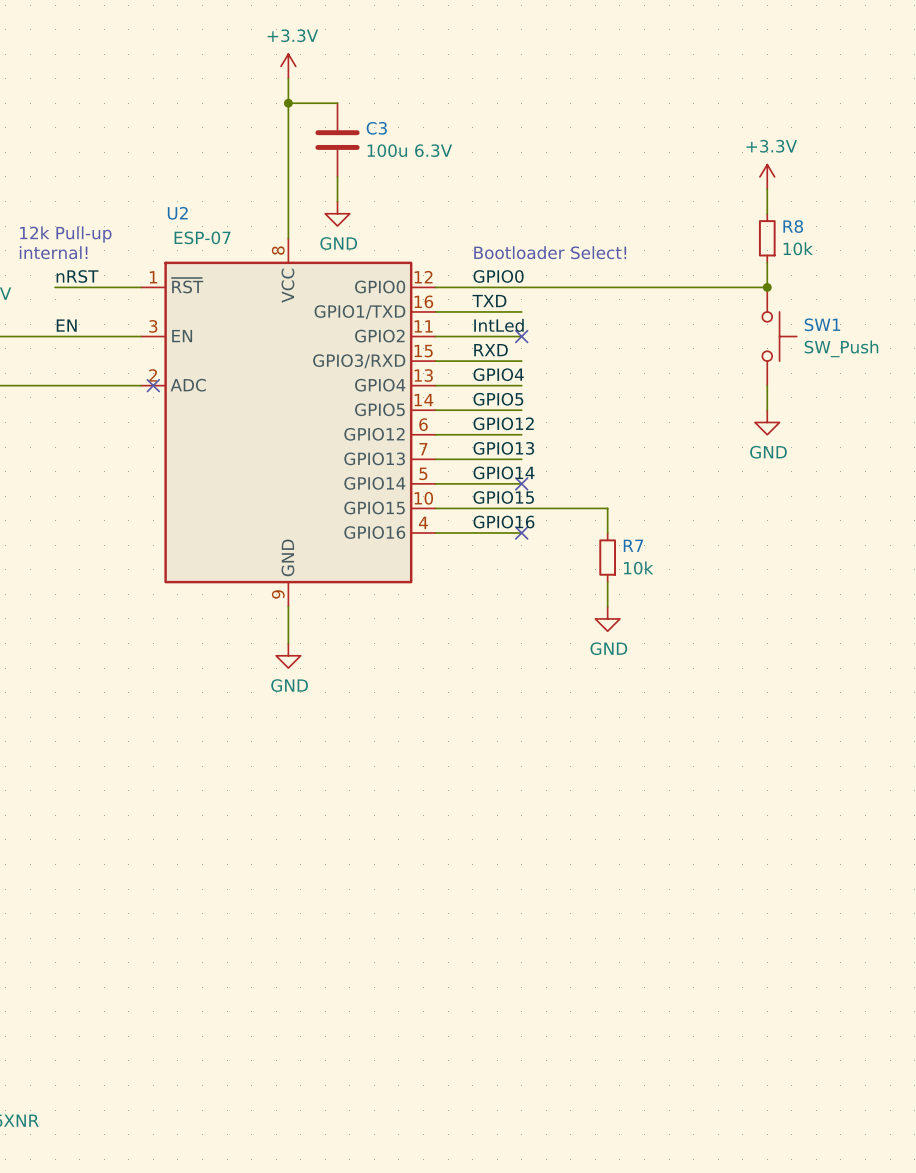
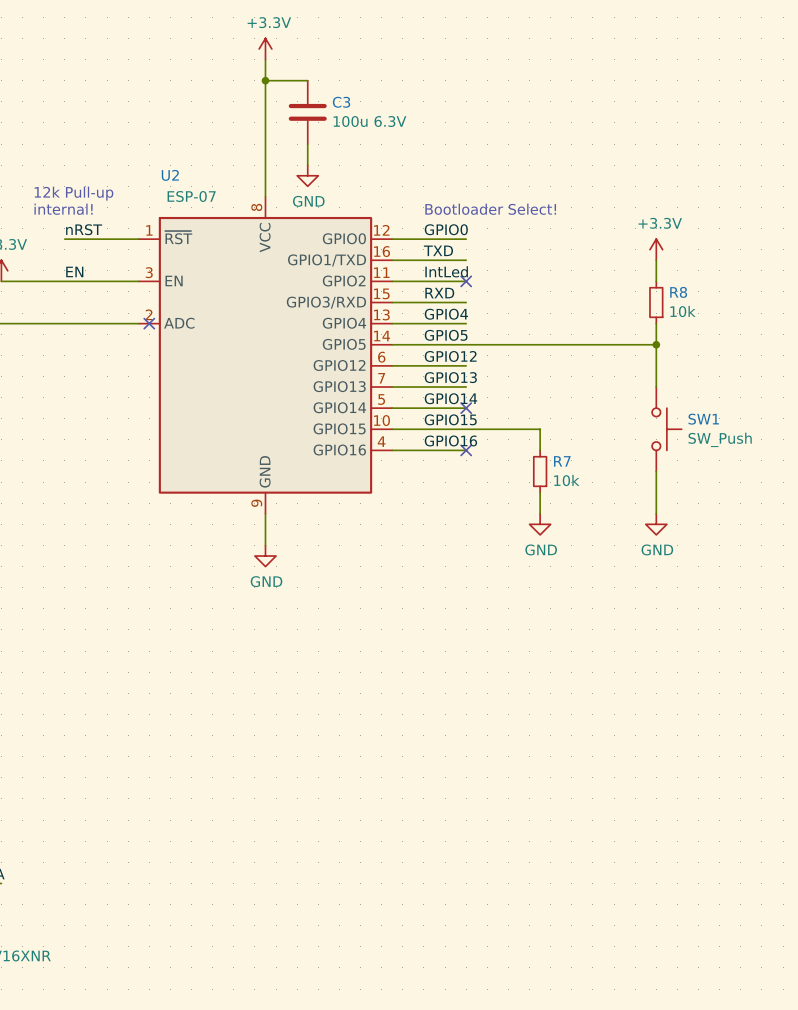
power symbol position: +3.3V (767, 176) -> +3.3V (656, 249)
wire: (767, 189) (767, 213) -> none
R8 position: (767, 238) -> (656, 302)
wire: (767, 262) (767, 287) (521, 287) -> none
junction: (767, 287) -> none
SW1 position: (779, 336) -> (666, 429)
wire: none -> (656, 323) (656, 387)
wire: (767, 385) (767, 410) -> (656, 260) (656, 281)
wire: none -> (466, 344) (656, 344)
junction: none -> (656, 344)
power symbol position: GND (767, 422) -> GND (656, 524)
wire: none -> (656, 471) (656, 513)

